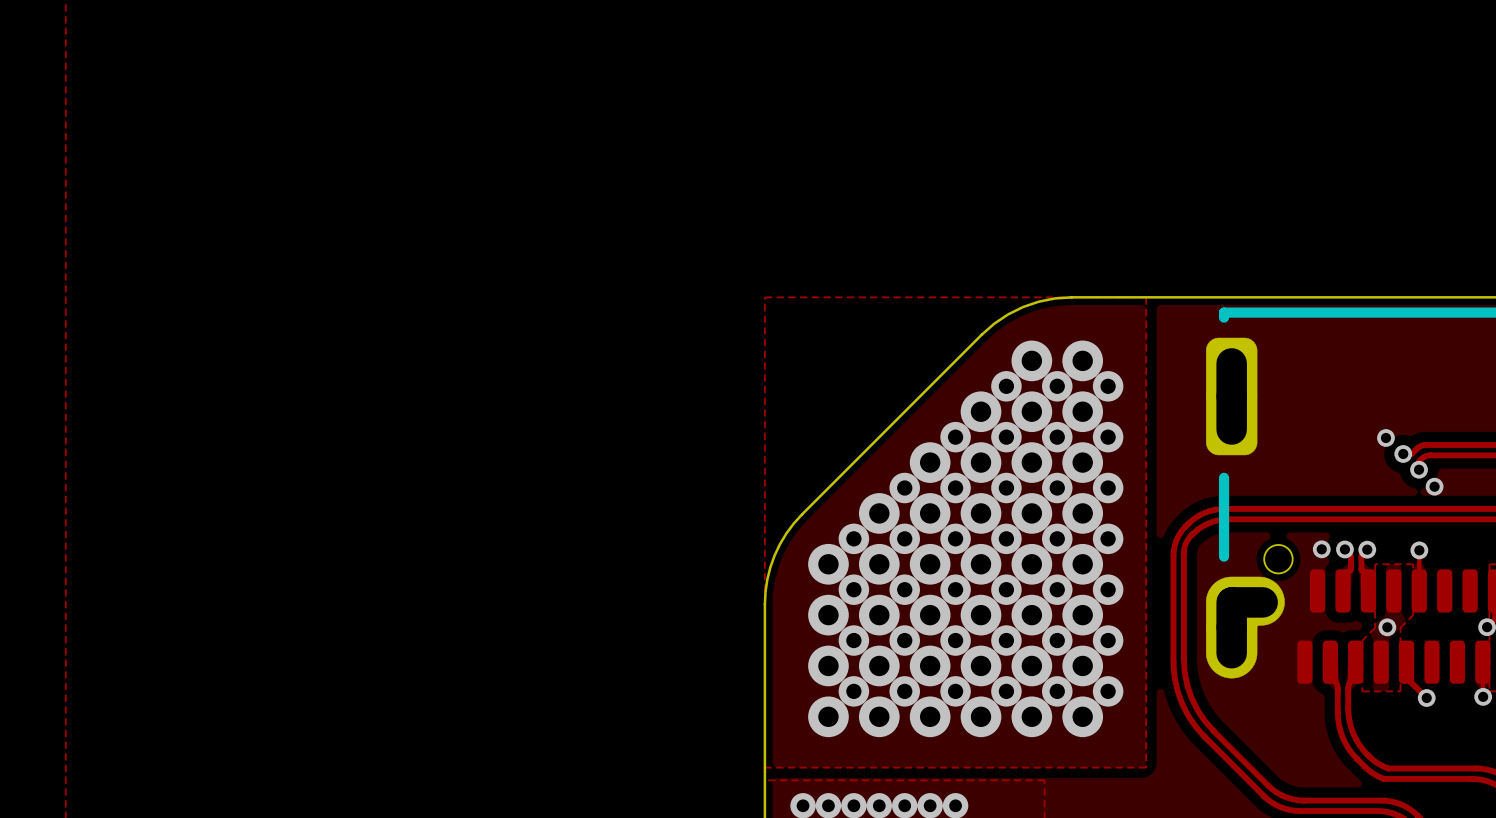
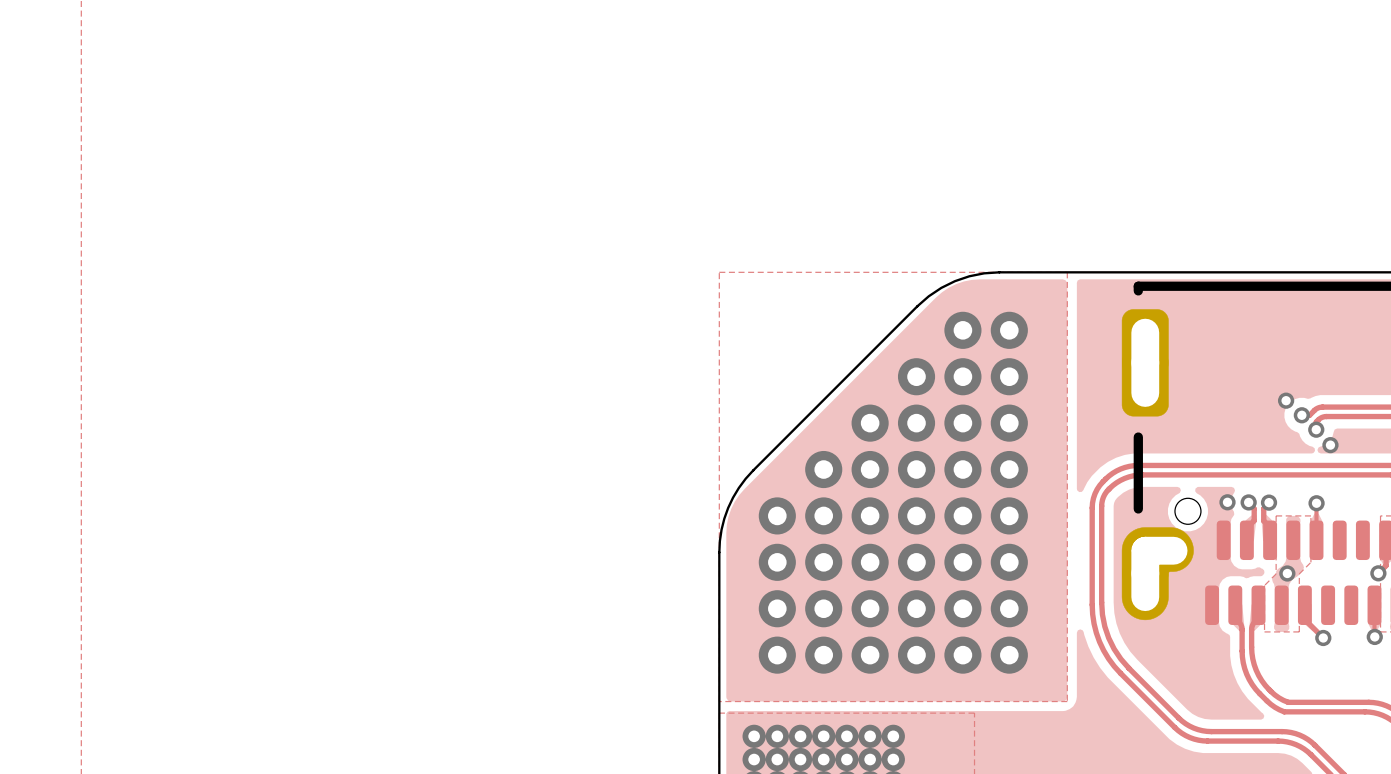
via: (1006, 386) -> none
via: (1057, 386) -> none
via: (1108, 386) -> none
via: (955, 437) -> none
via: (1006, 437) -> none
via: (1057, 437) -> none
via: (1108, 437) -> none
via: (904, 488) -> none
via: (955, 488) -> none
via: (1006, 488) -> none
via: (1057, 488) -> none
via: (1108, 488) -> none
via: (853, 538) -> none
via: (904, 538) -> none
via: (955, 538) -> none
via: (1006, 538) -> none
via: (1057, 538) -> none
via: (1108, 538) -> none
via: (853, 589) -> none
via: (904, 589) -> none
via: (955, 589) -> none
via: (1006, 589) -> none
via: (1057, 589) -> none
via: (1108, 589) -> none
via: (853, 640) -> none
via: (904, 640) -> none
via: (955, 640) -> none
via: (1006, 640) -> none
via: (1057, 640) -> none
via: (1108, 640) -> none
via: (853, 691) -> none
via: (904, 691) -> none
via: (955, 691) -> none
via: (1006, 691) -> none
via: (1057, 691) -> none
via: (1108, 691) -> none

